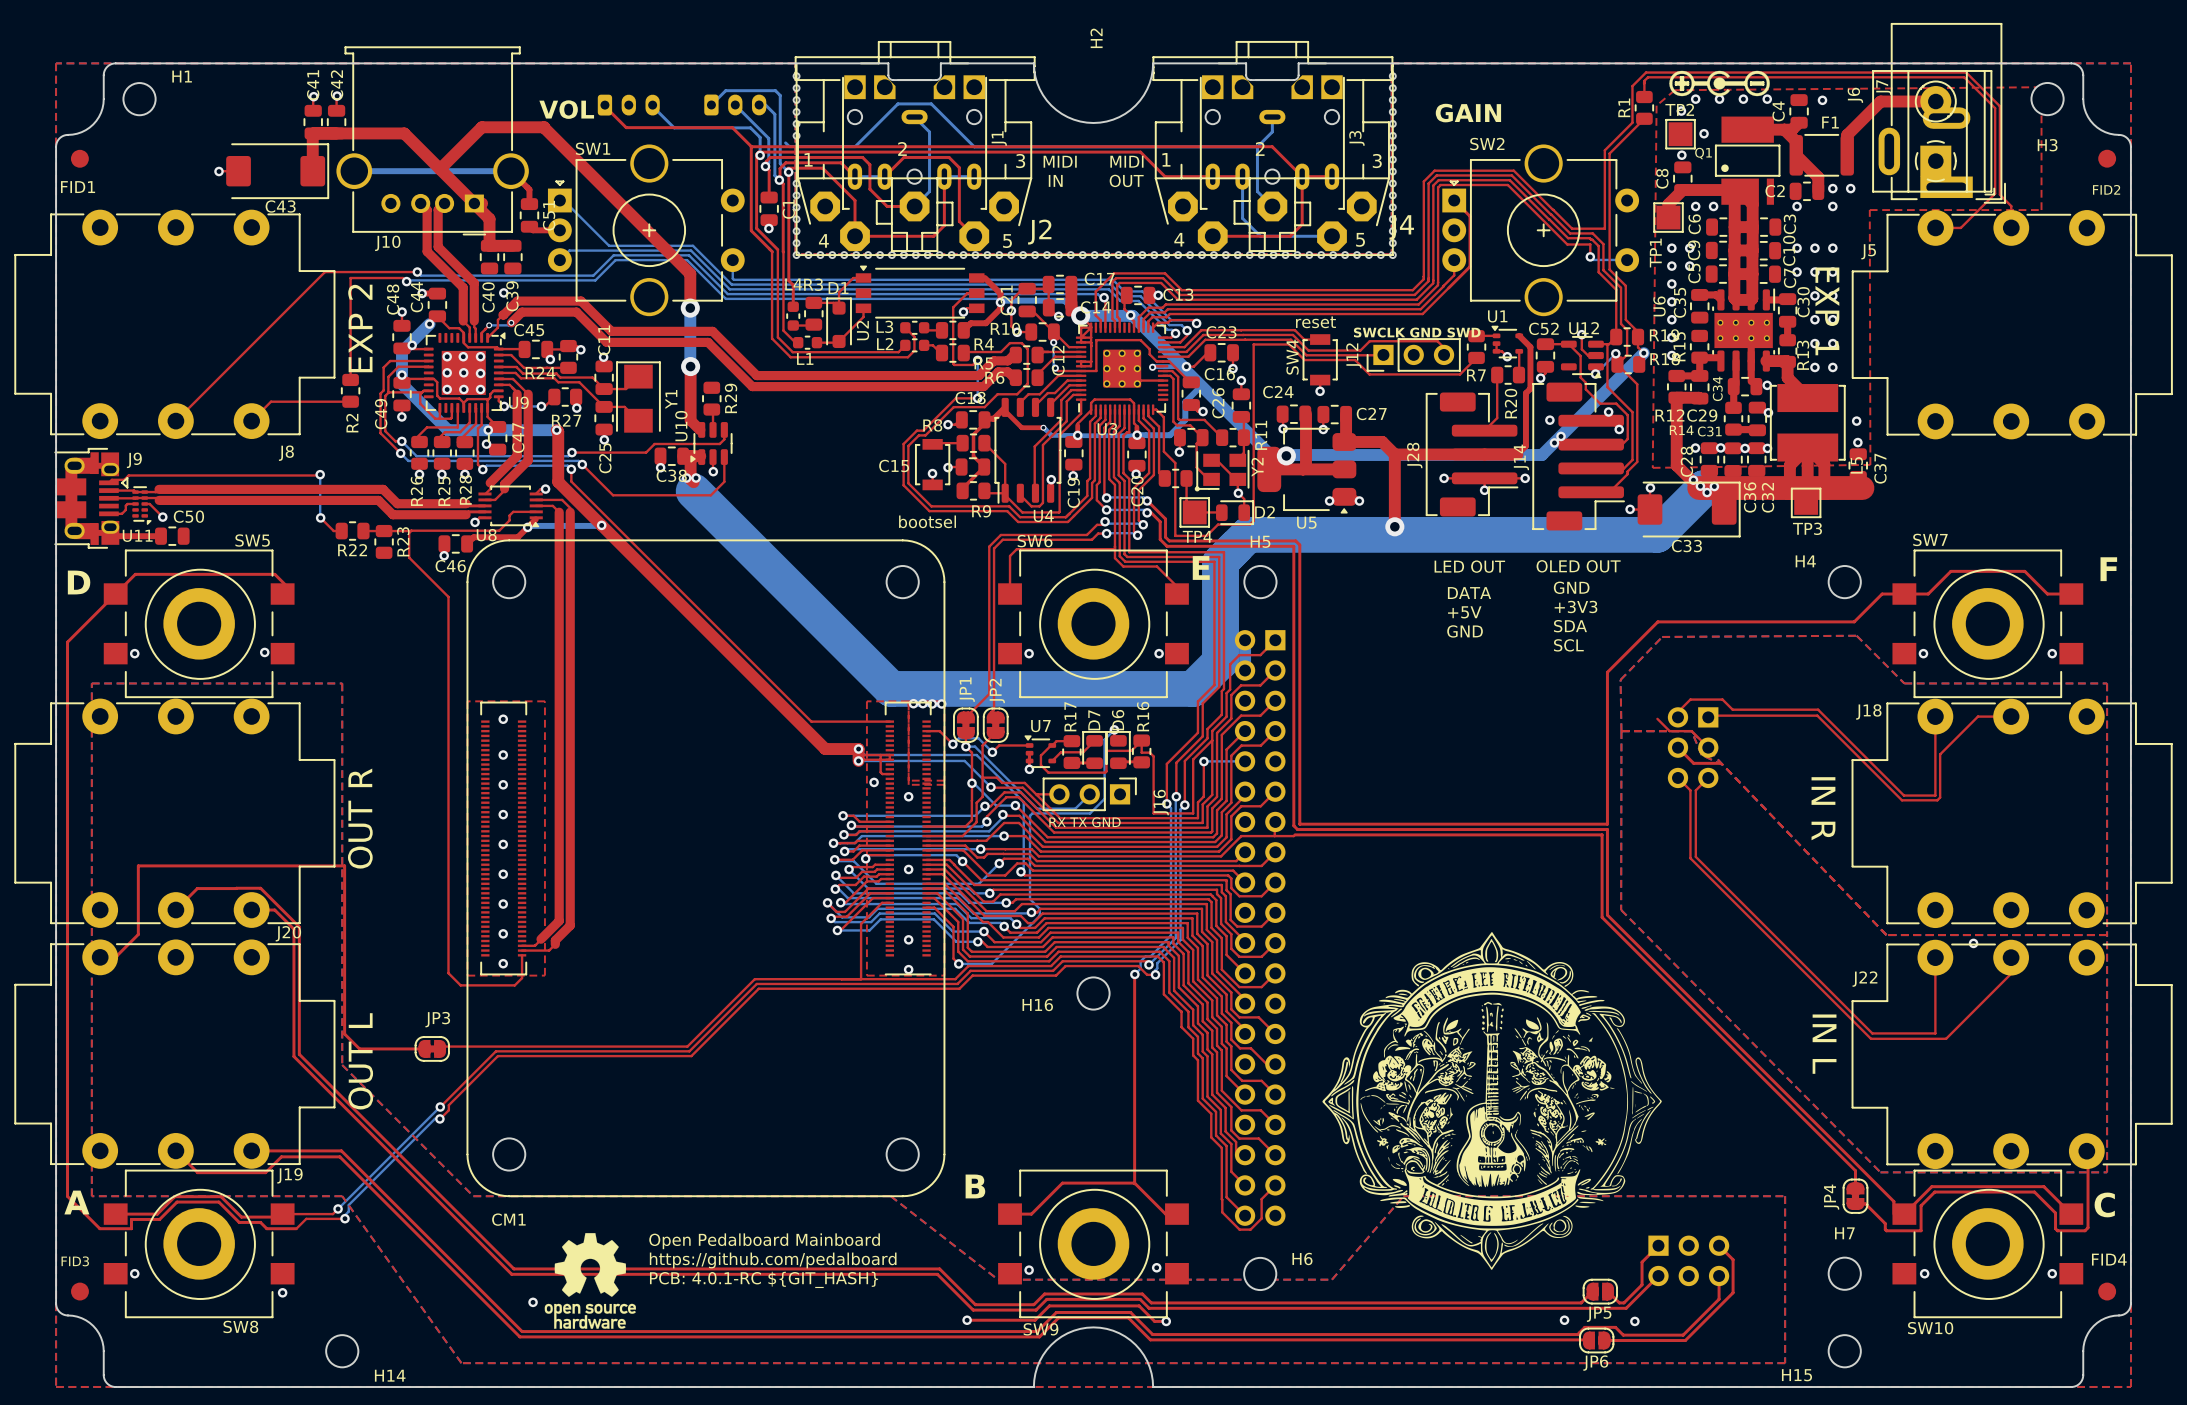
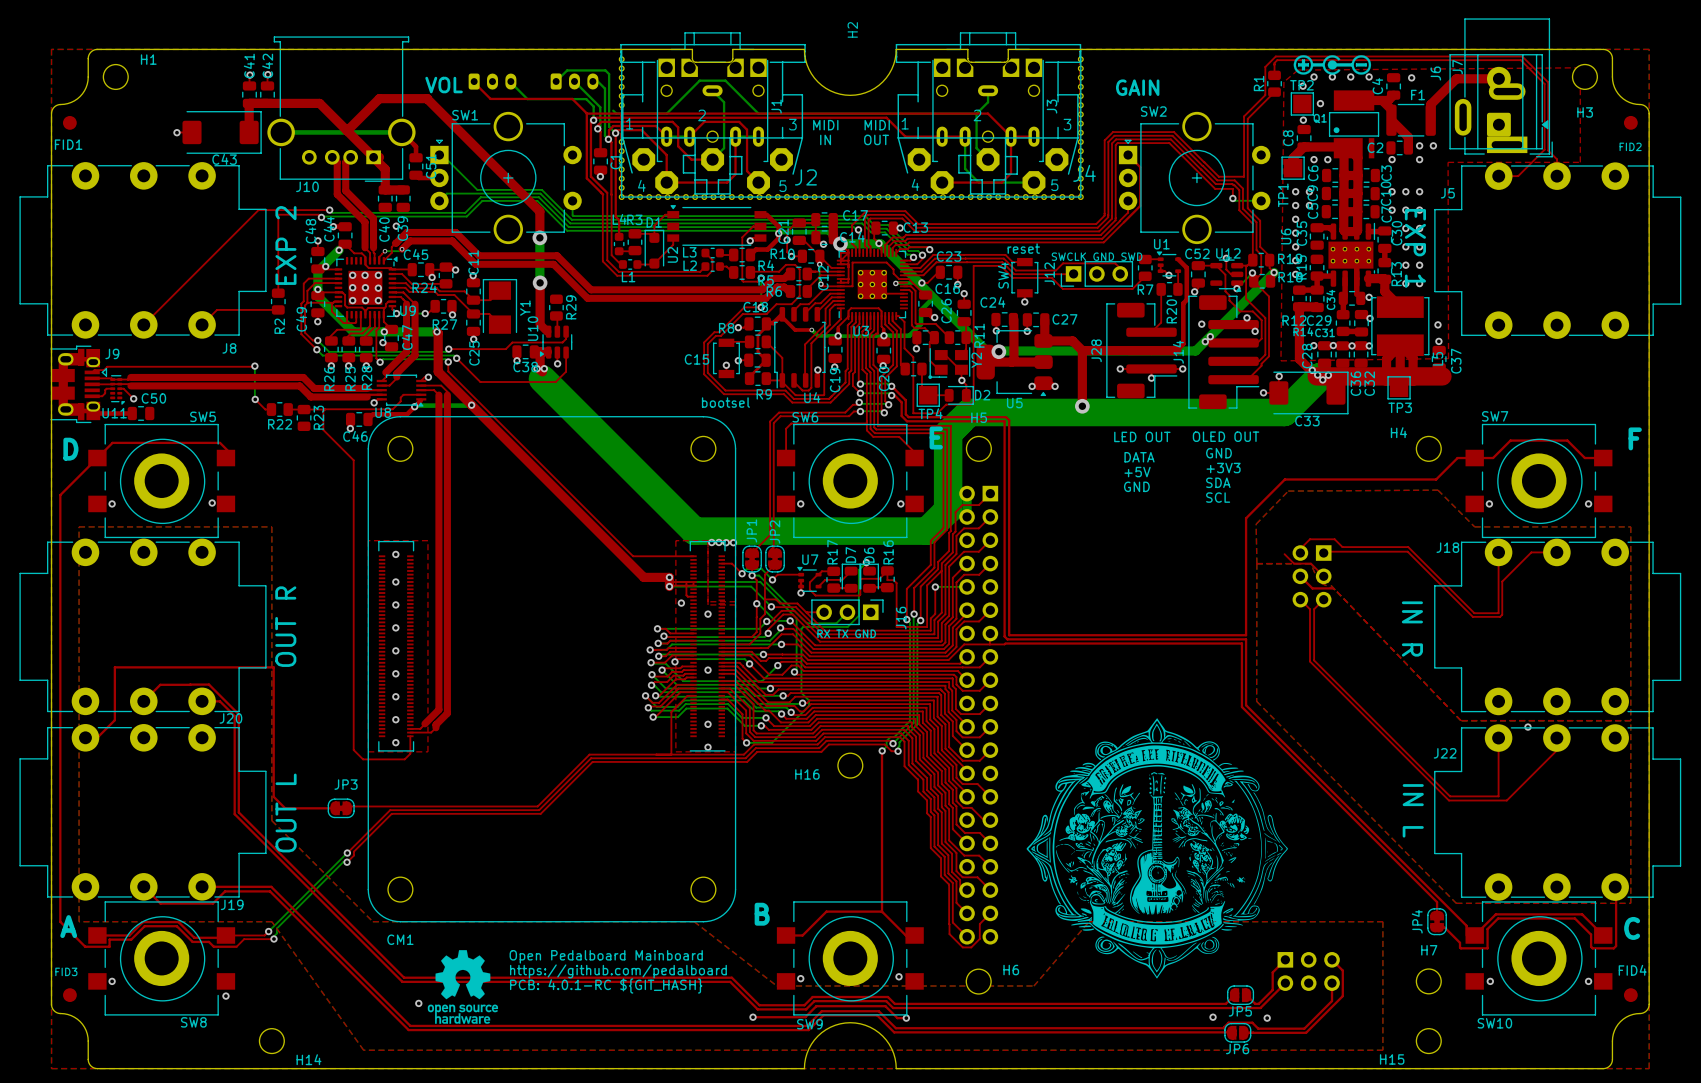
J6 footprint: [1872, 70, 1995, 196] -> [1449, 54, 1549, 150]

